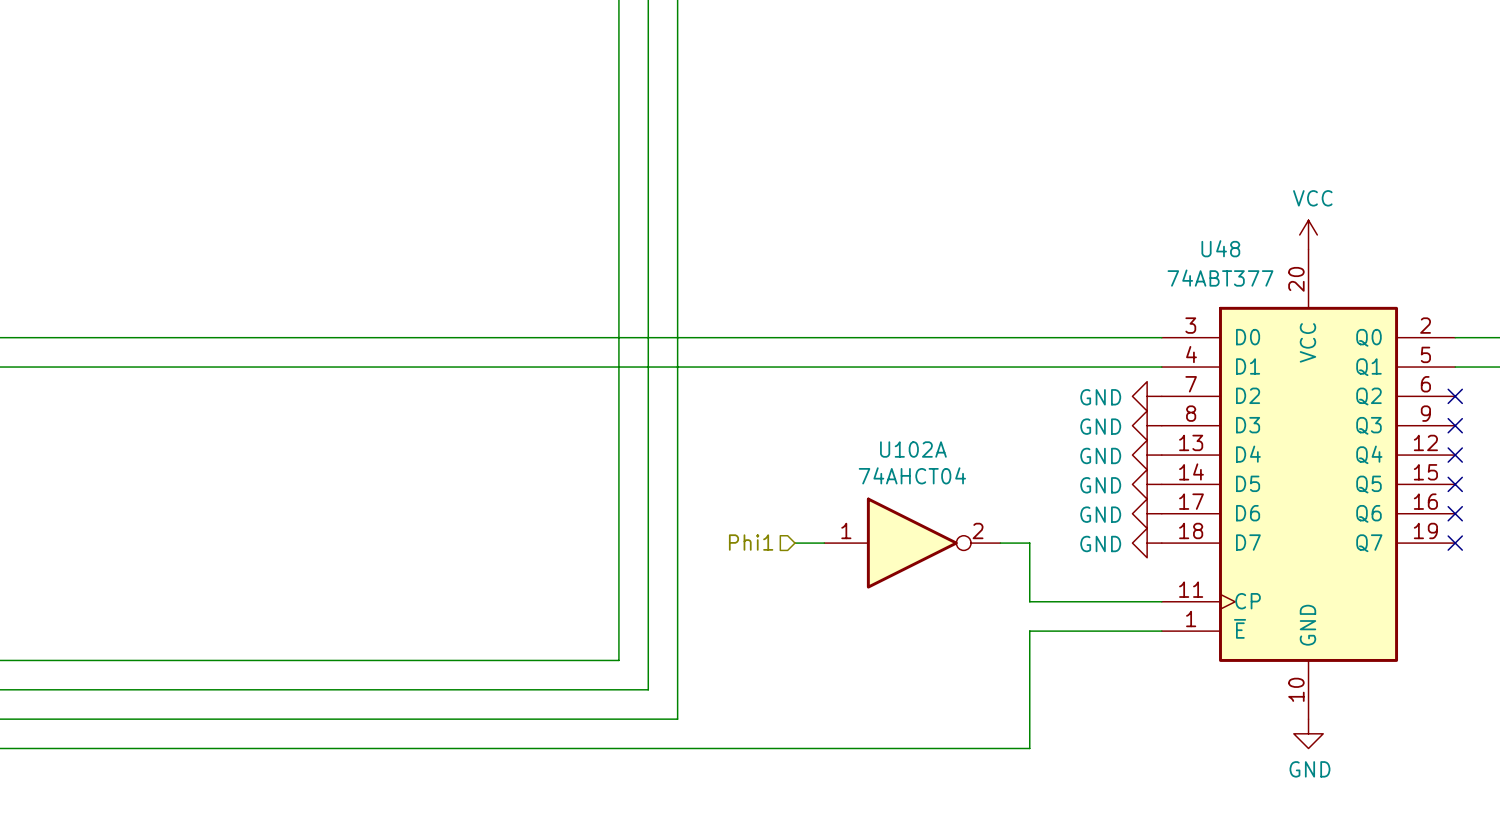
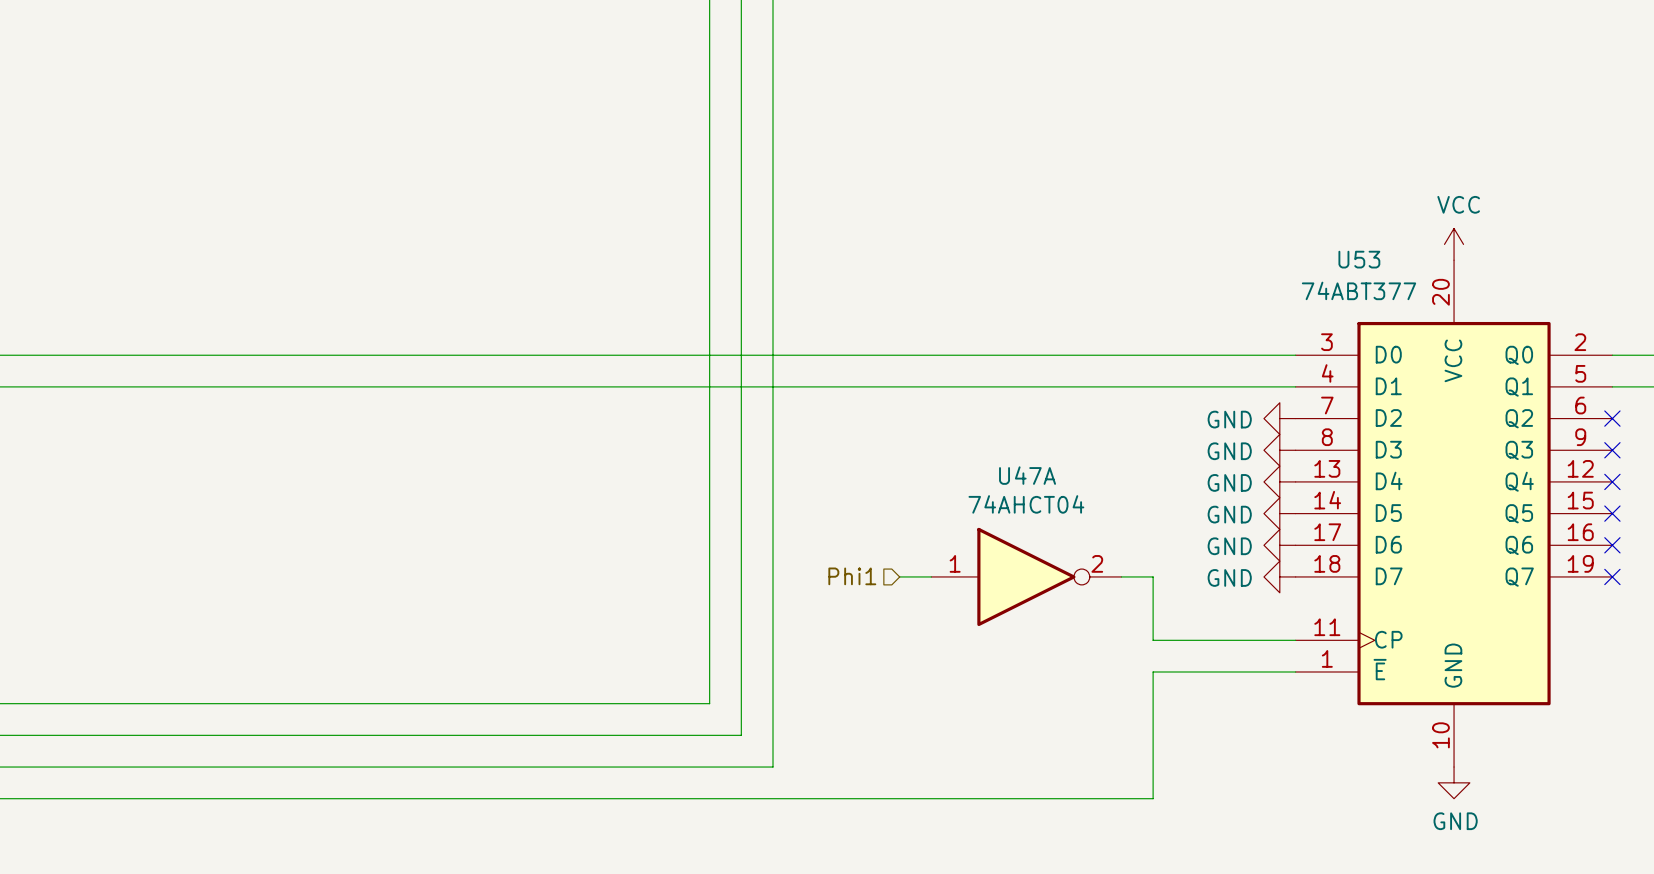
U48 name: U48 (1220, 248) -> U53 (1359, 259)
U102A name: U102A (913, 449) -> U47A (1027, 475)

